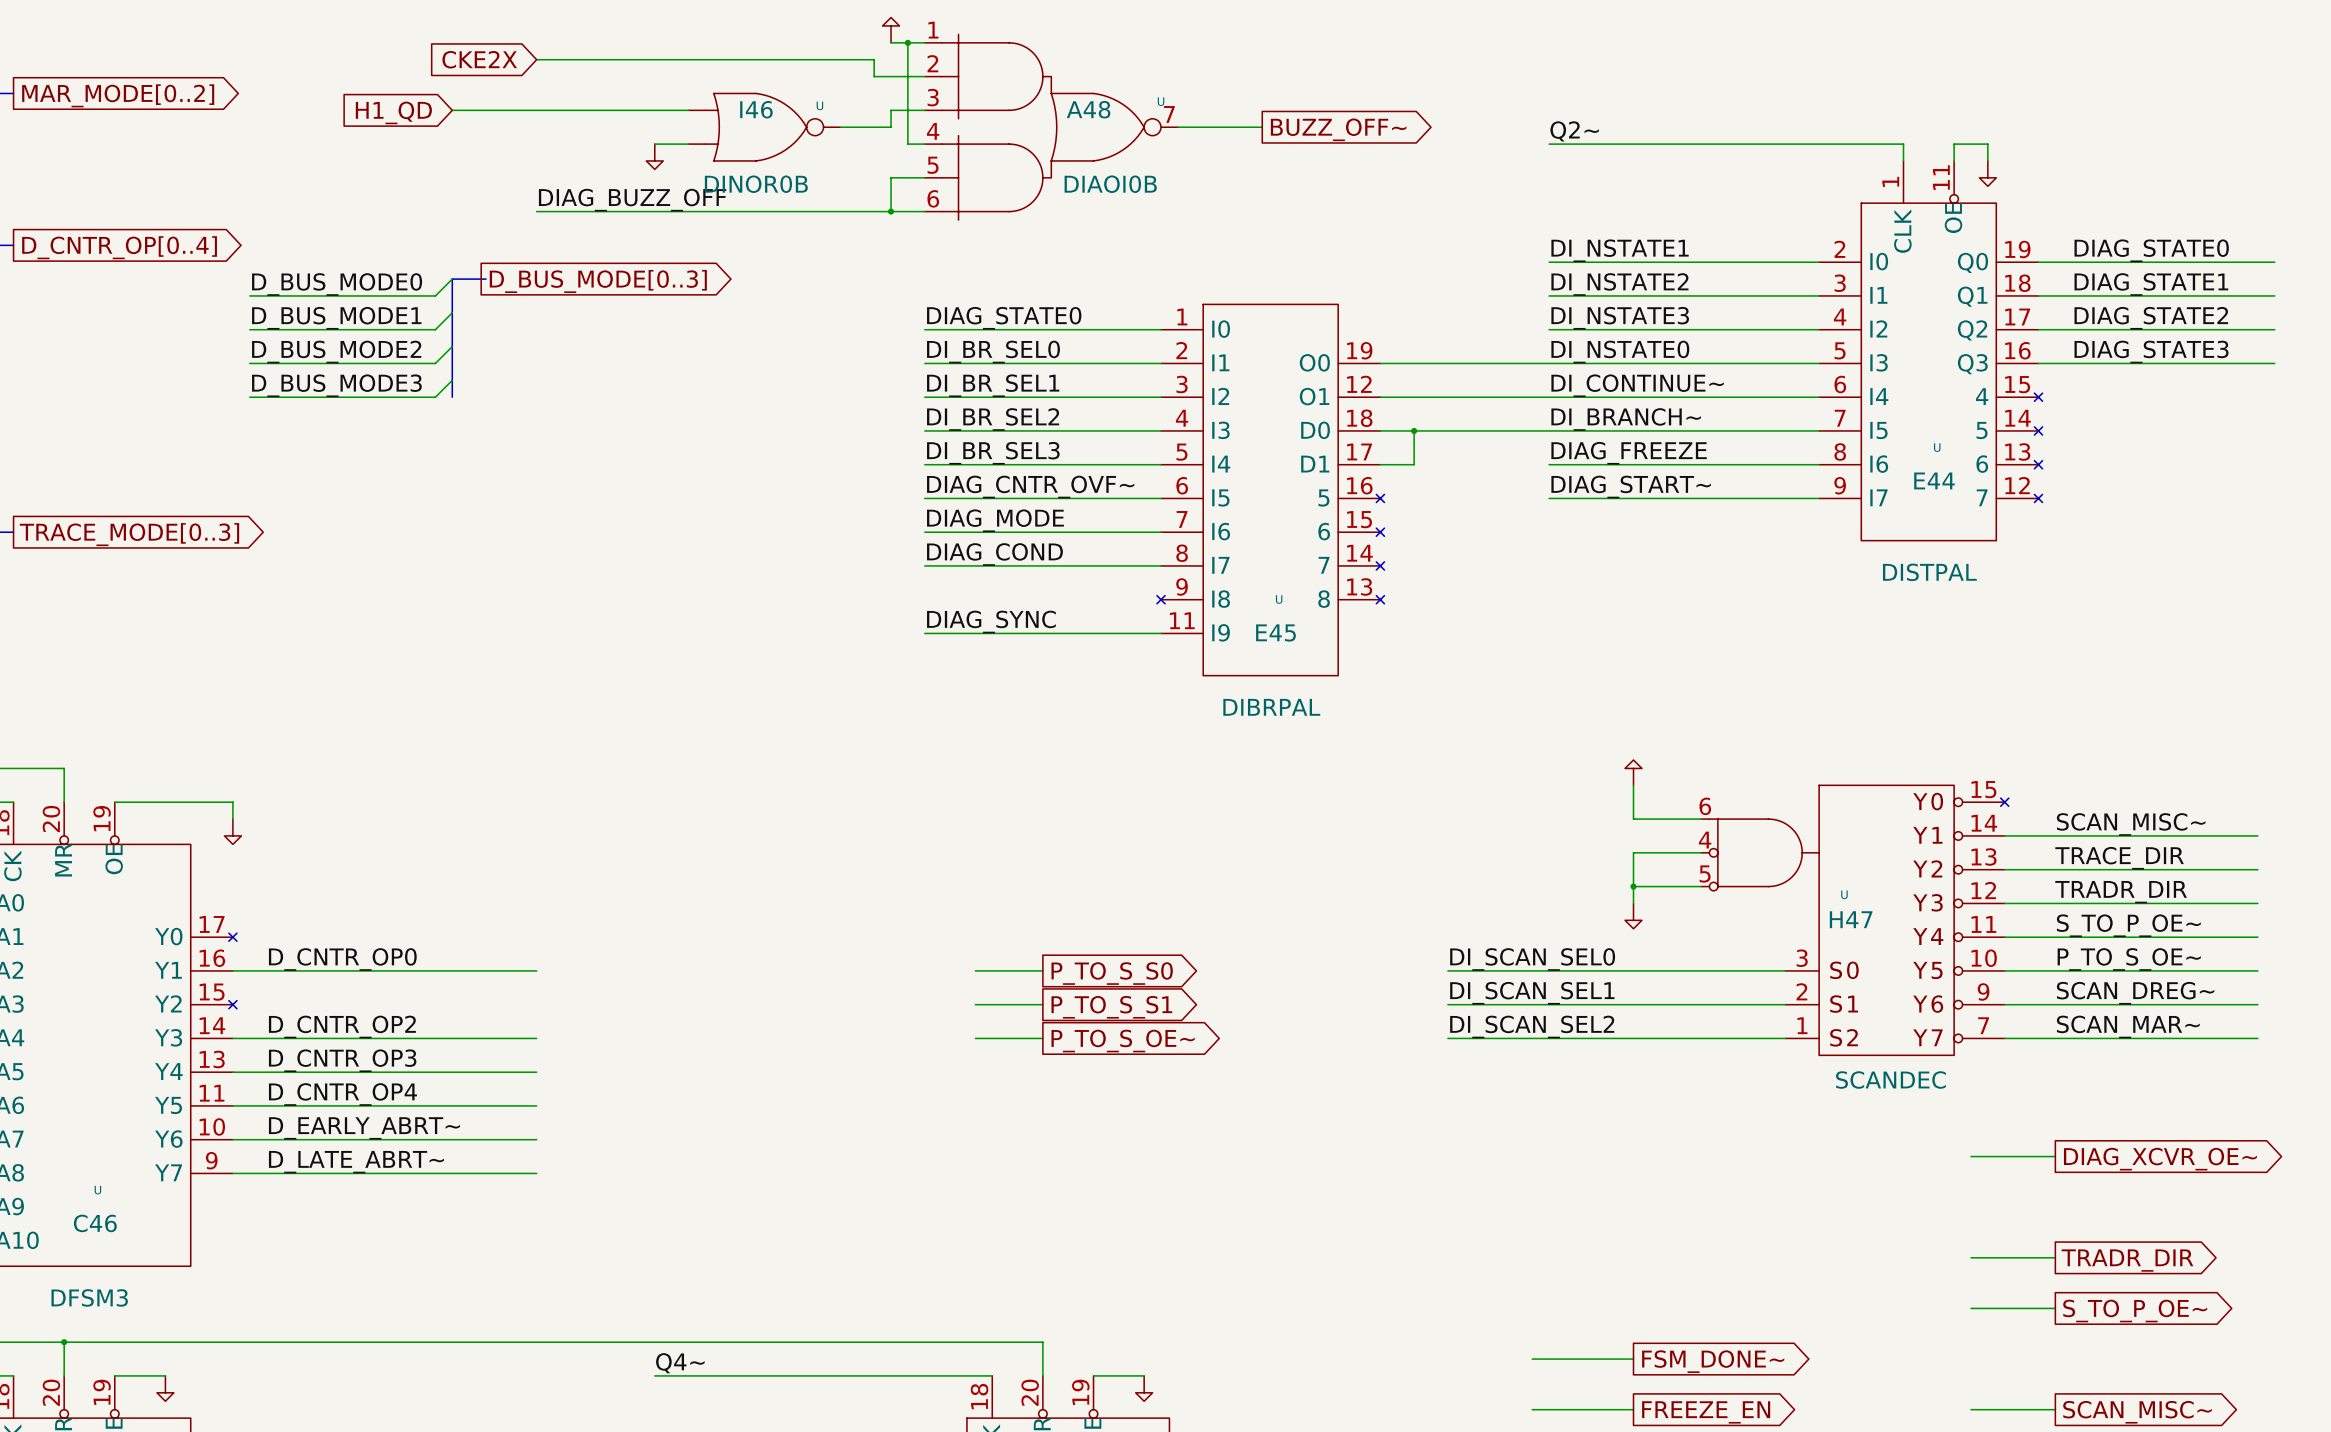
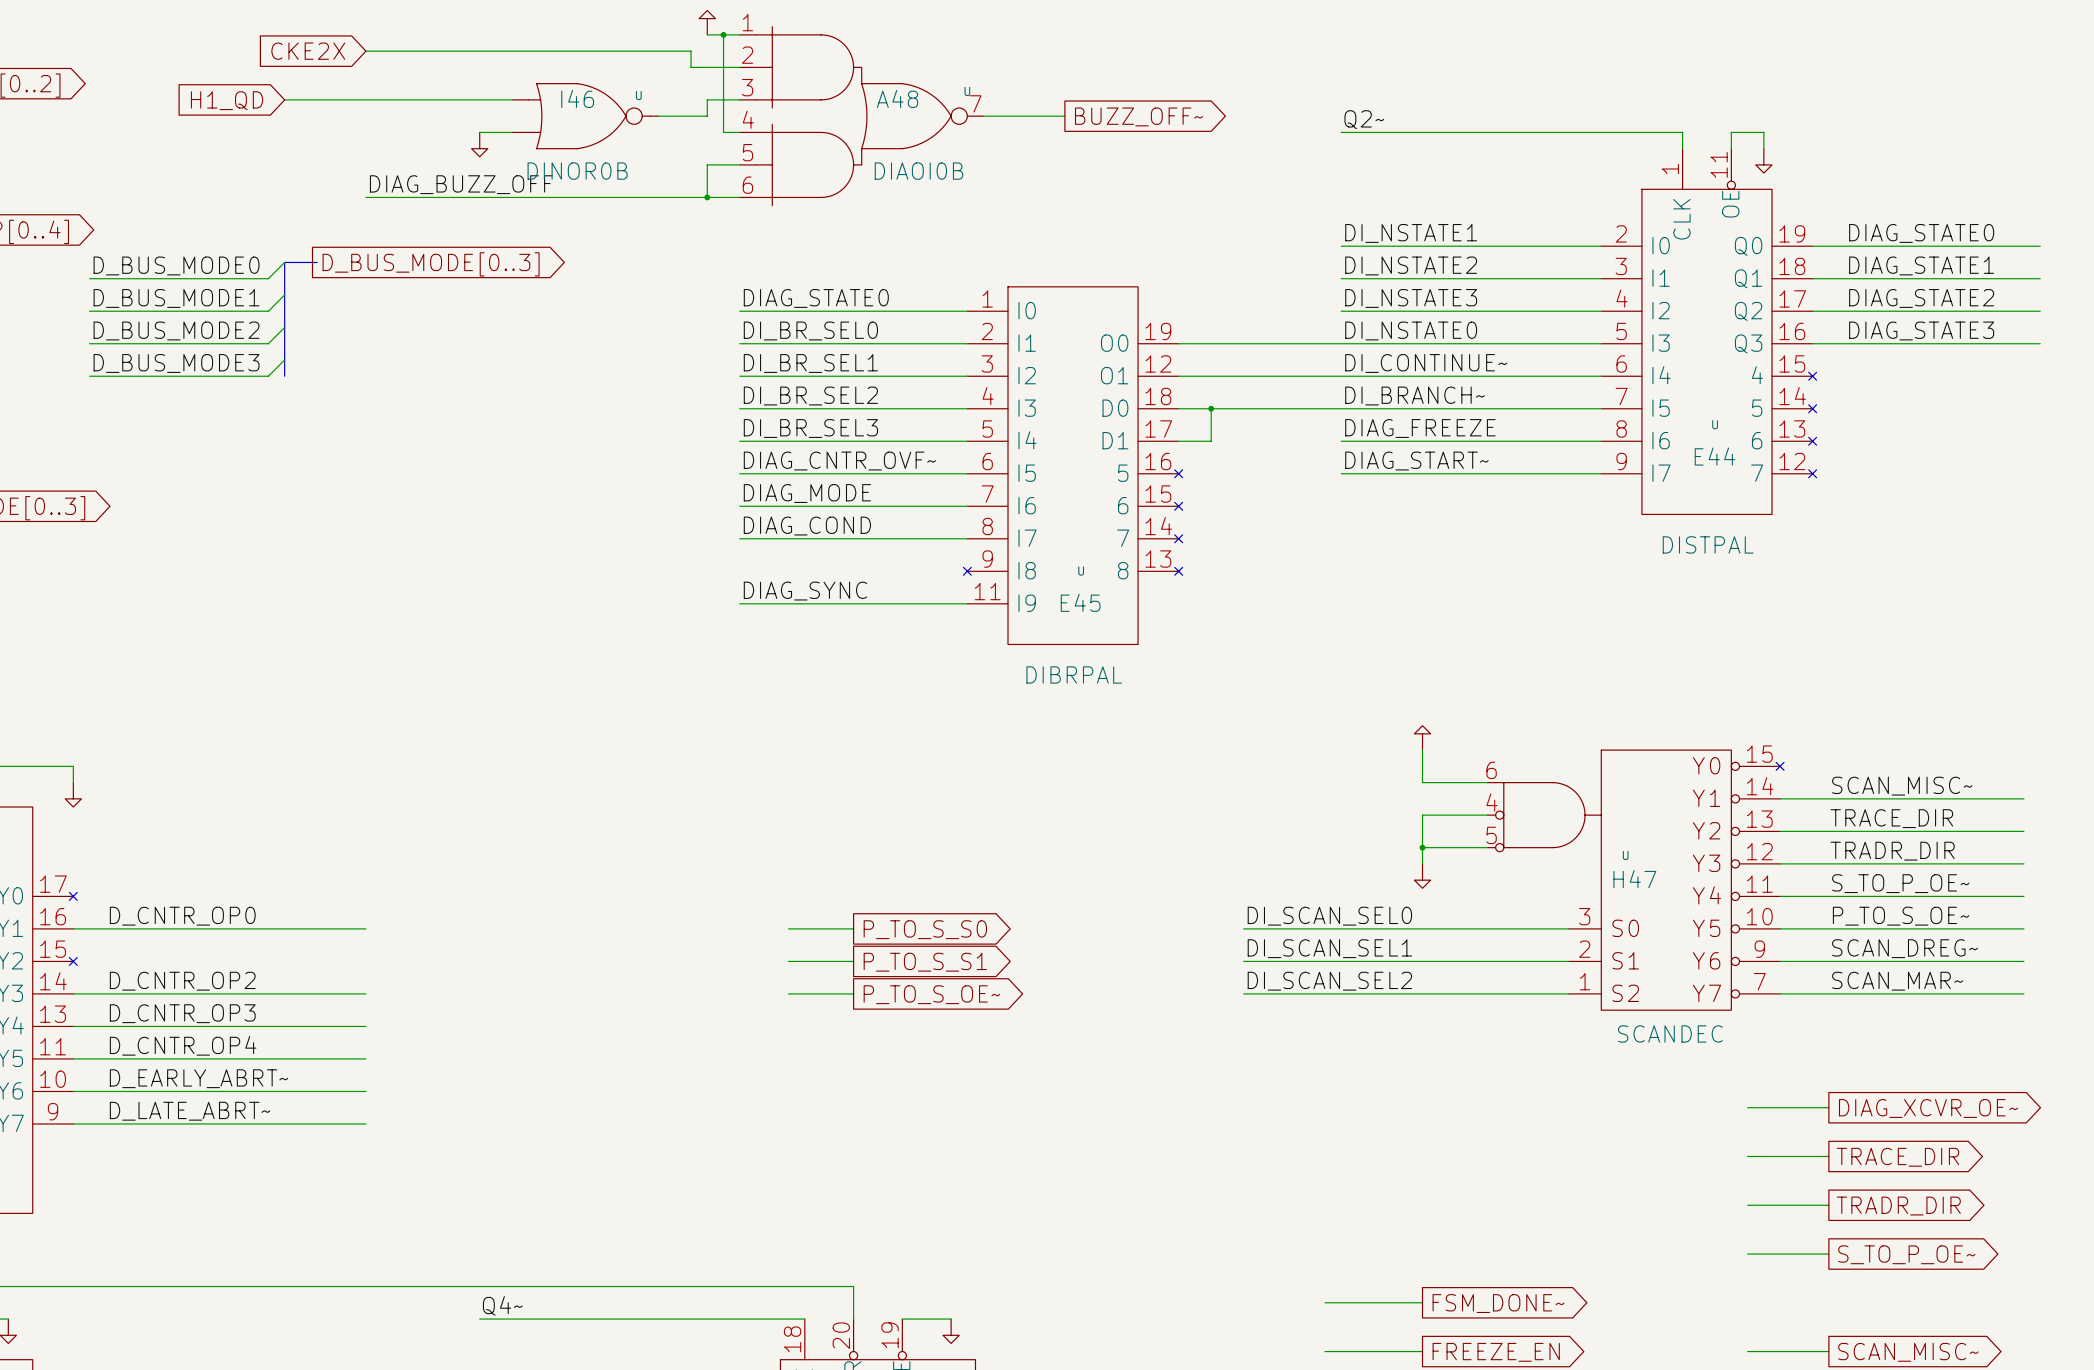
wire: none -> (1747, 1156) (1828, 1156)
global label: none -> TRACE_DIR (1897, 1157)

